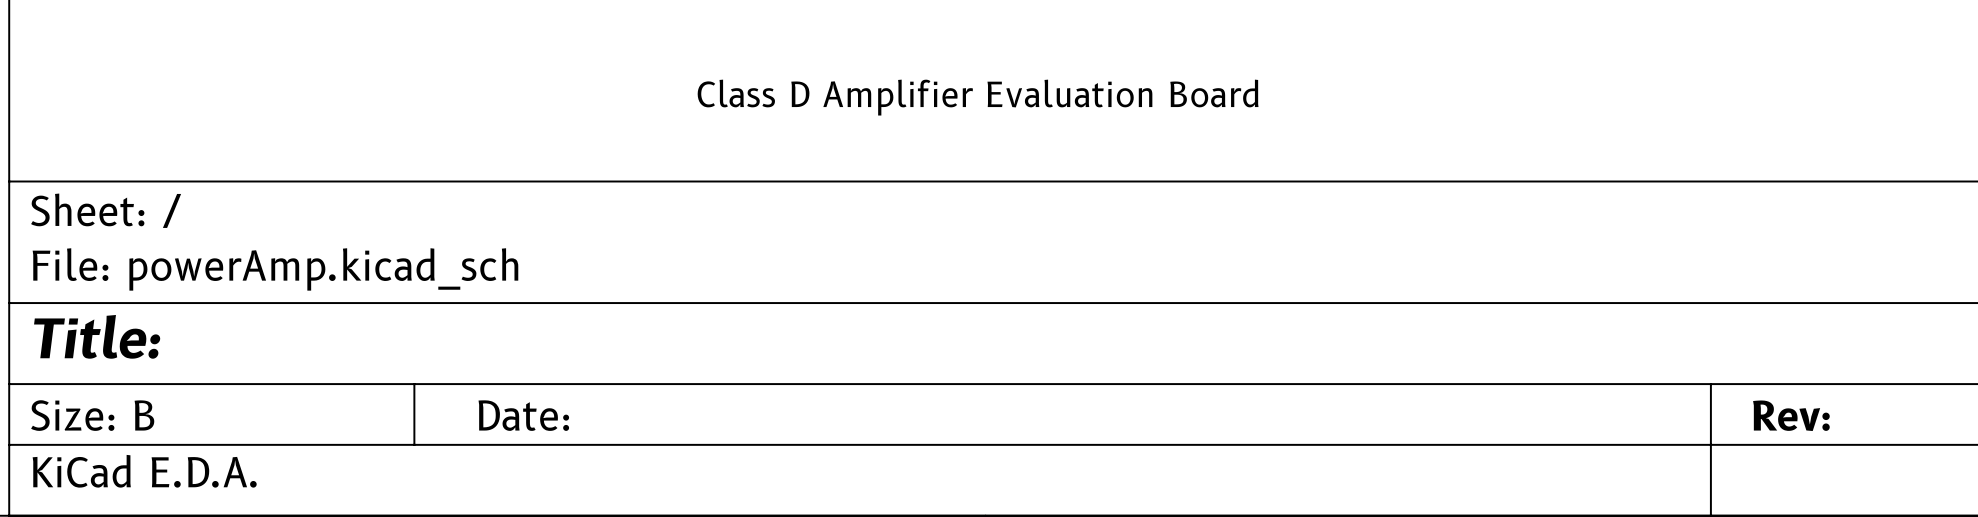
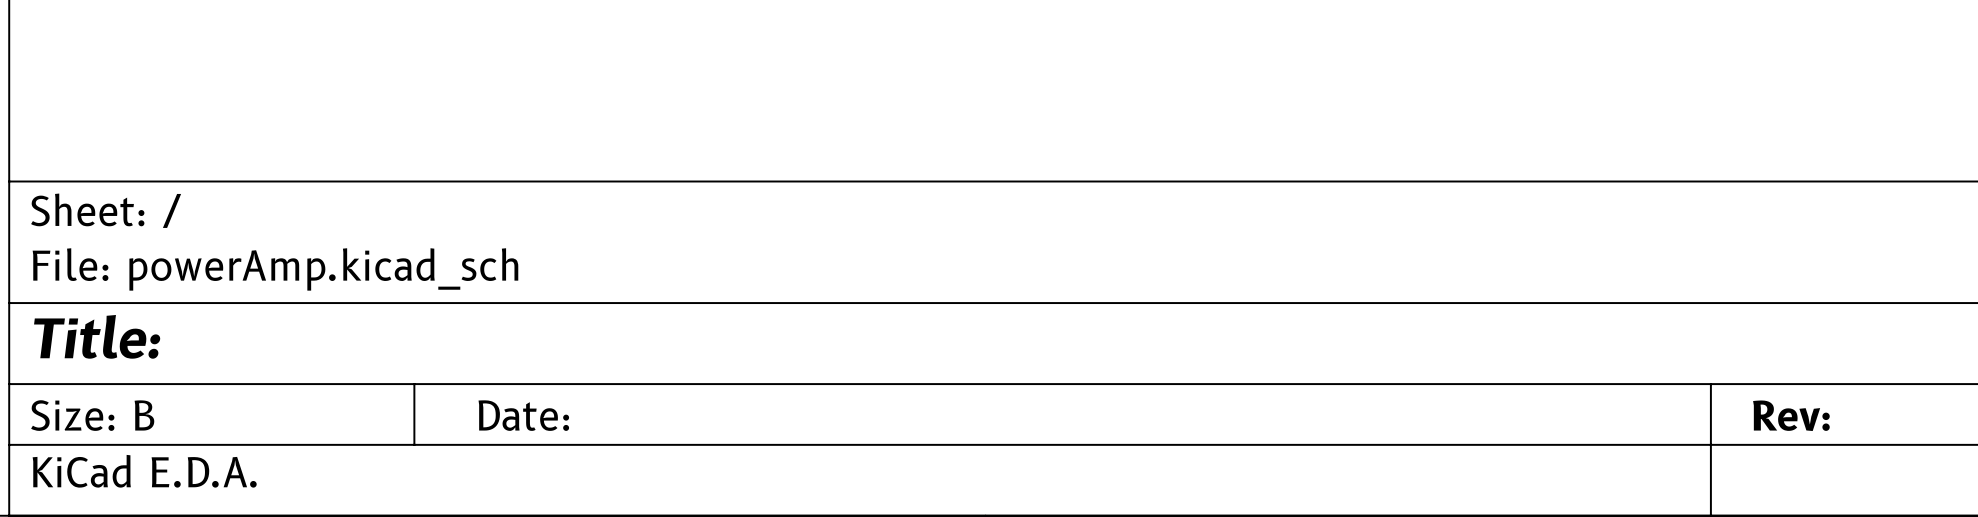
text: Class D Amplifier Evaluation Board (978, 97) -> none

